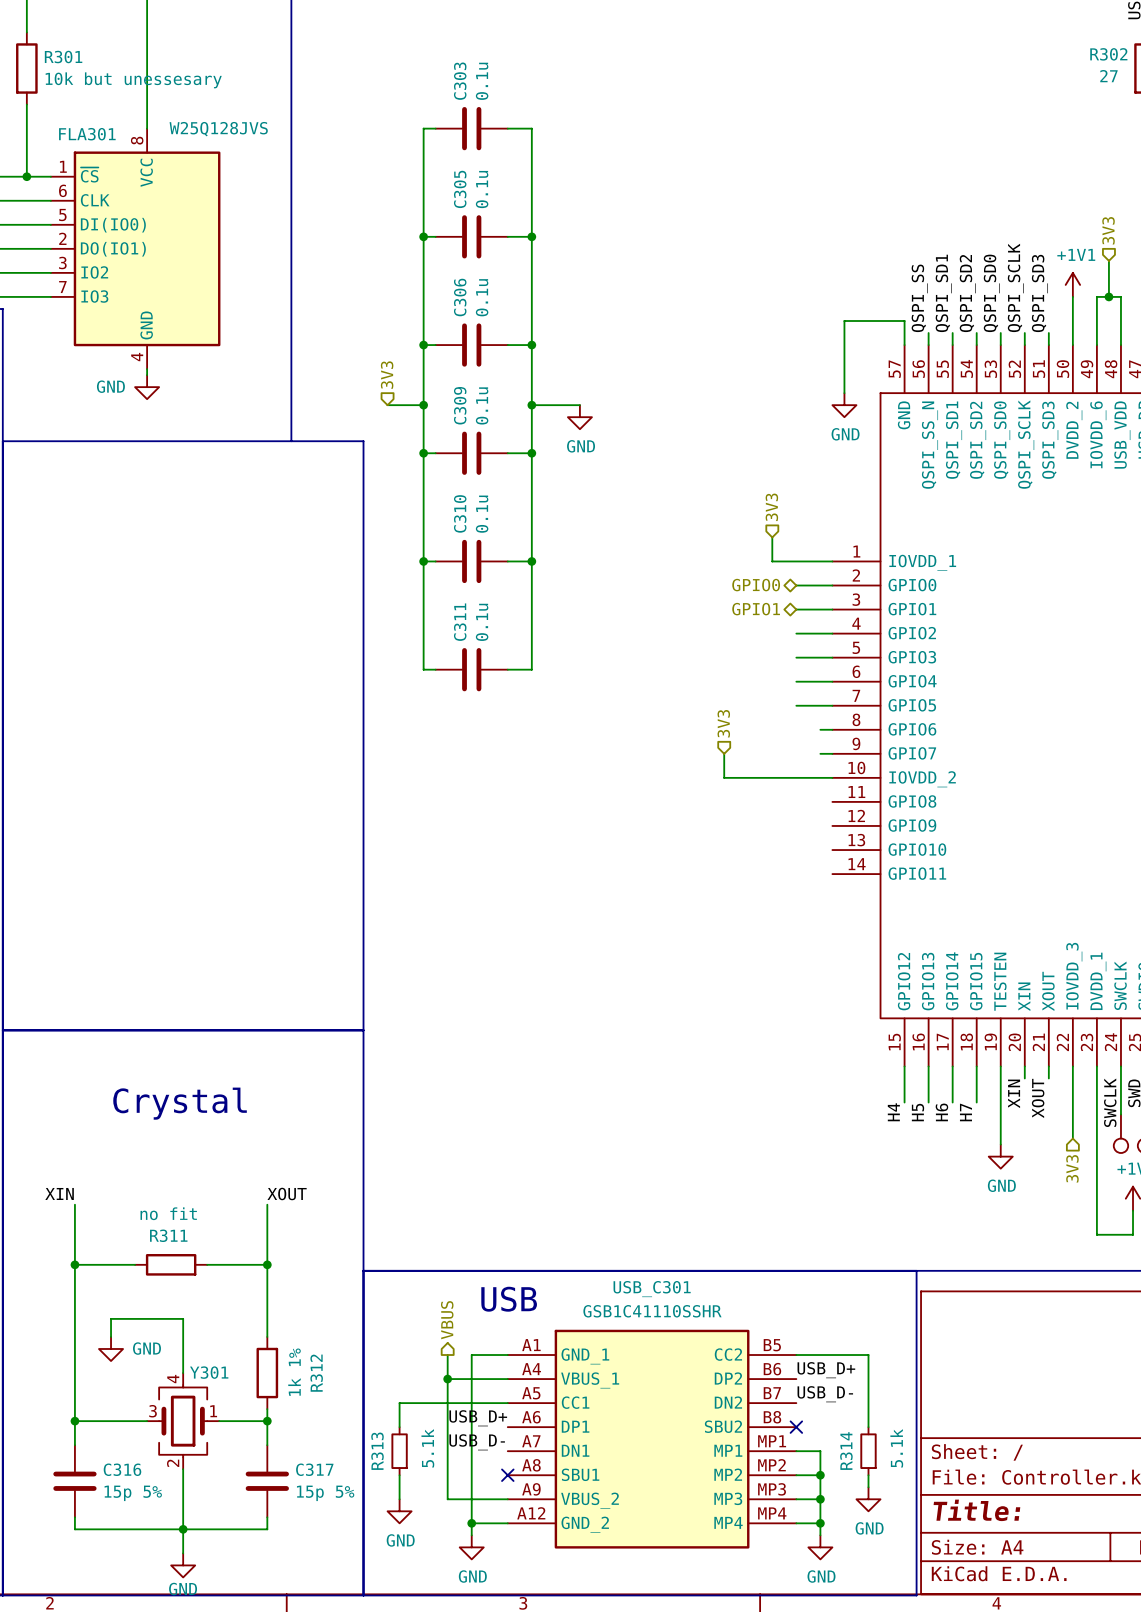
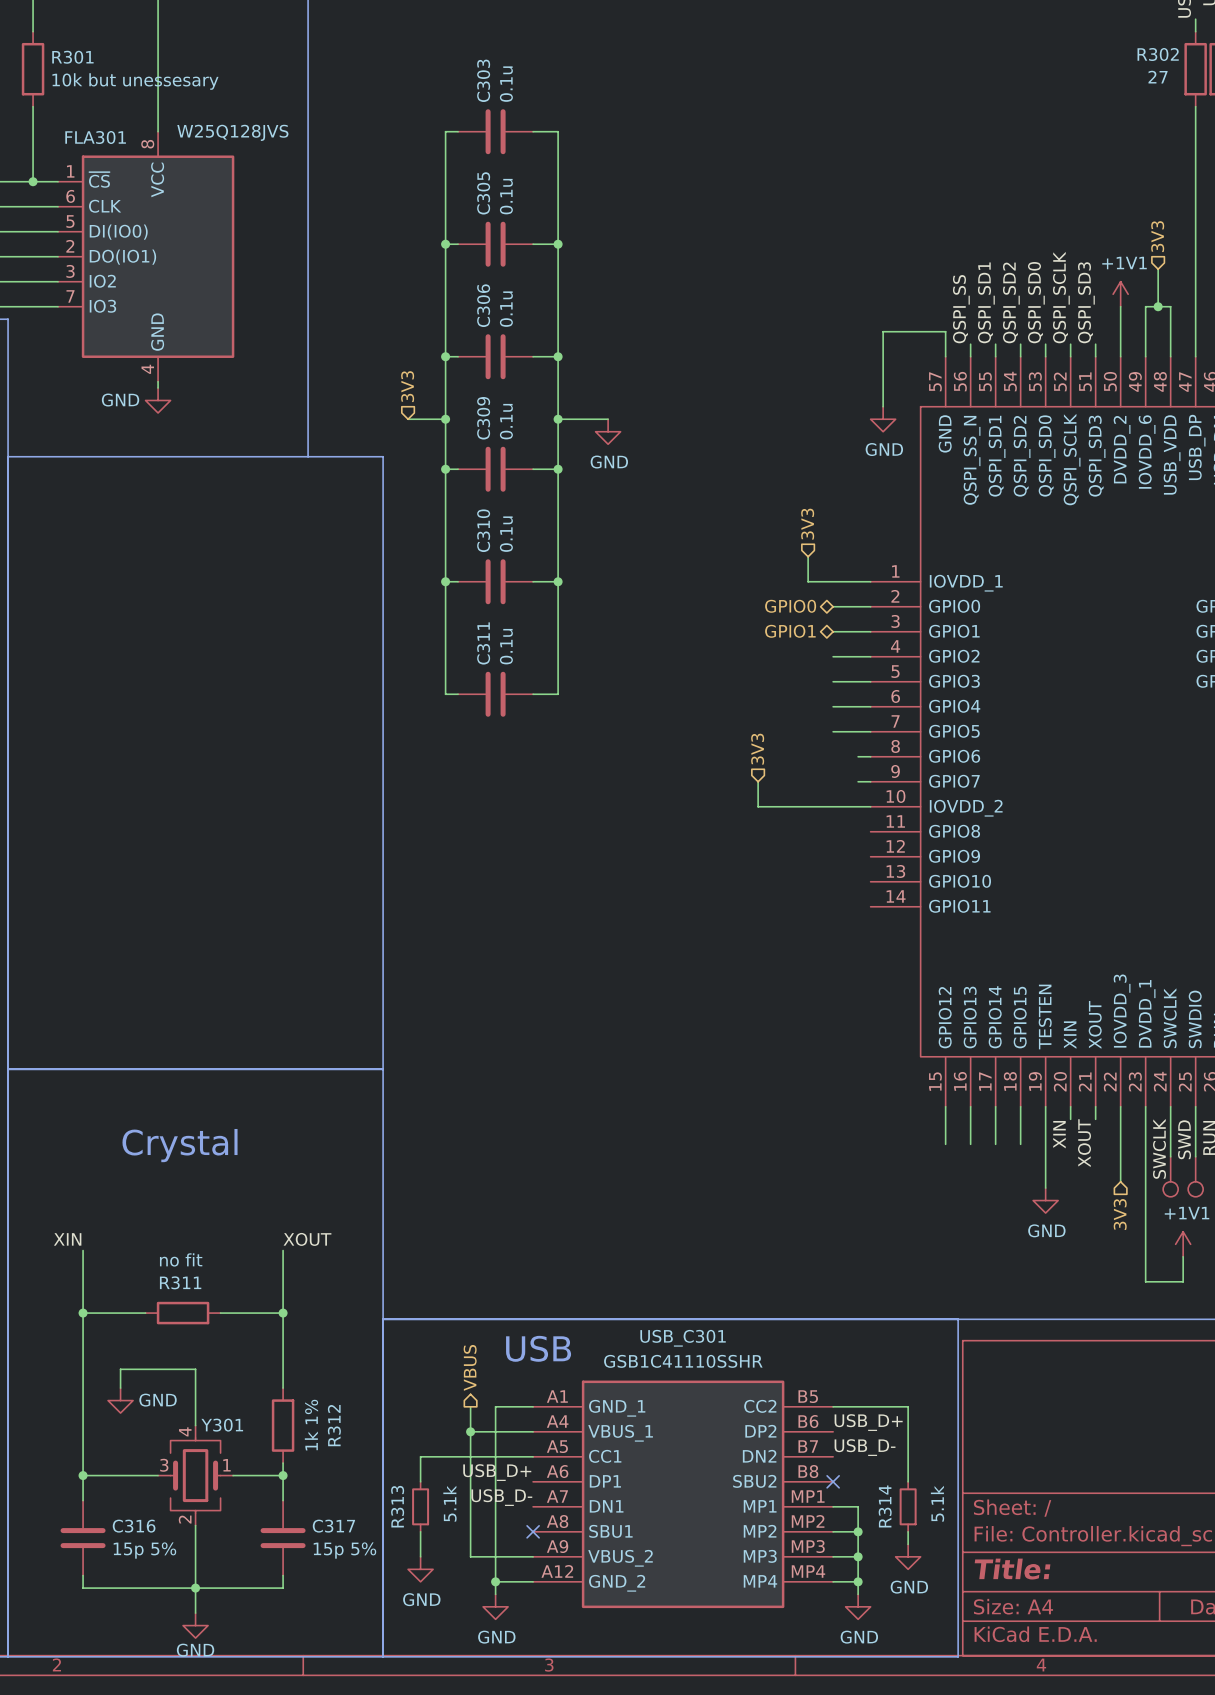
label: H4 (893, 1112) -> none
label: H5 (918, 1112) -> none
label: H6 (941, 1112) -> none
label: H7 (965, 1112) -> none

